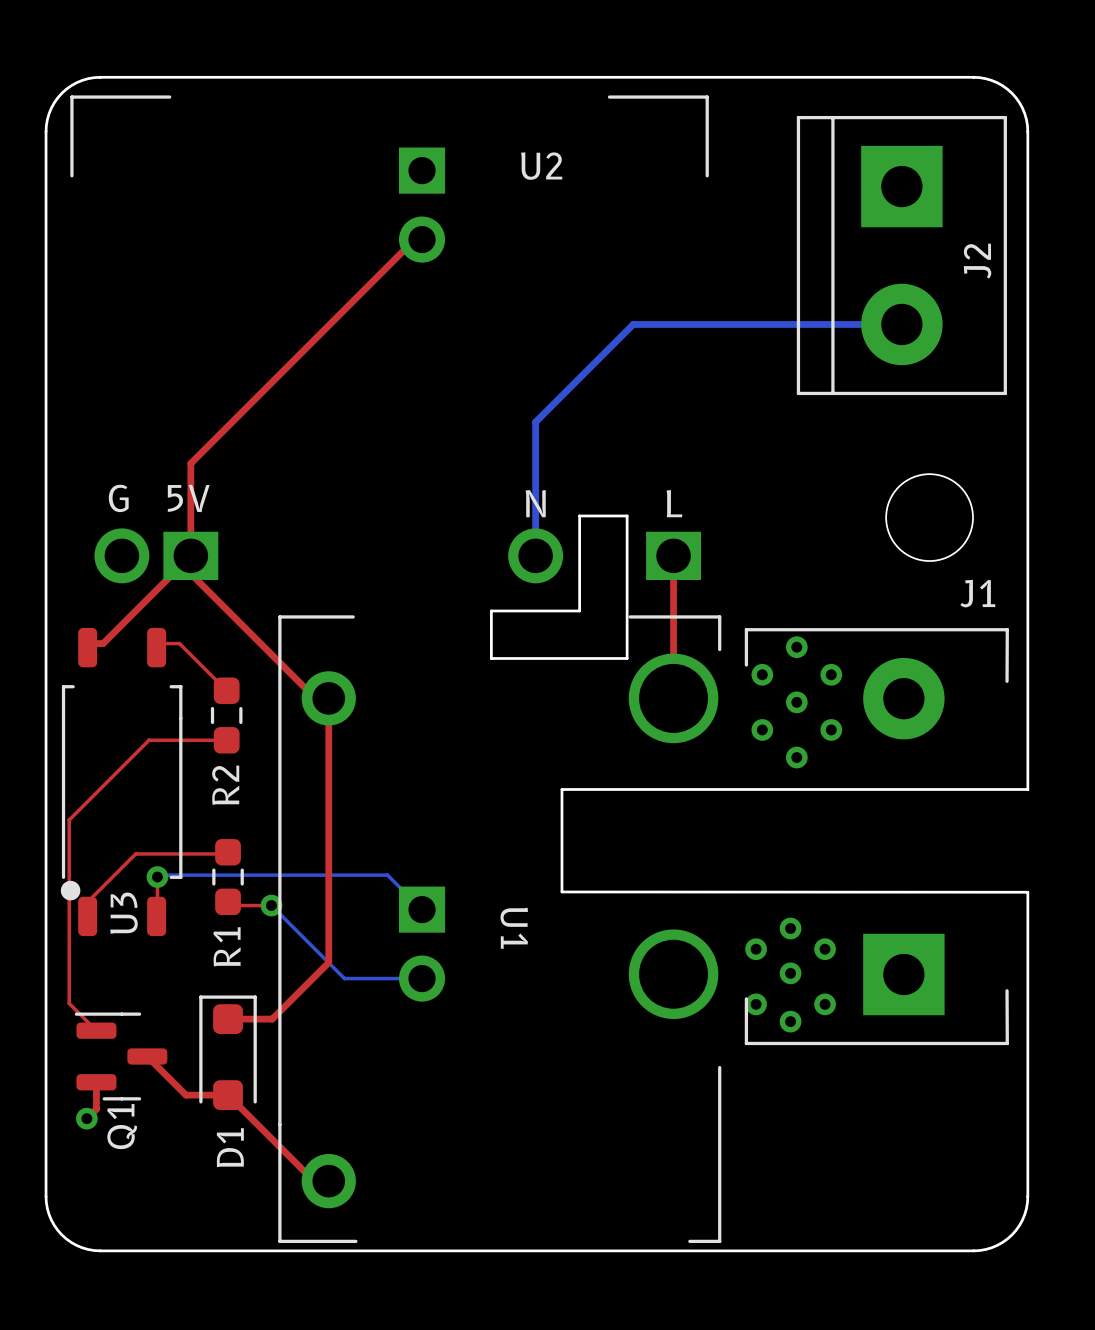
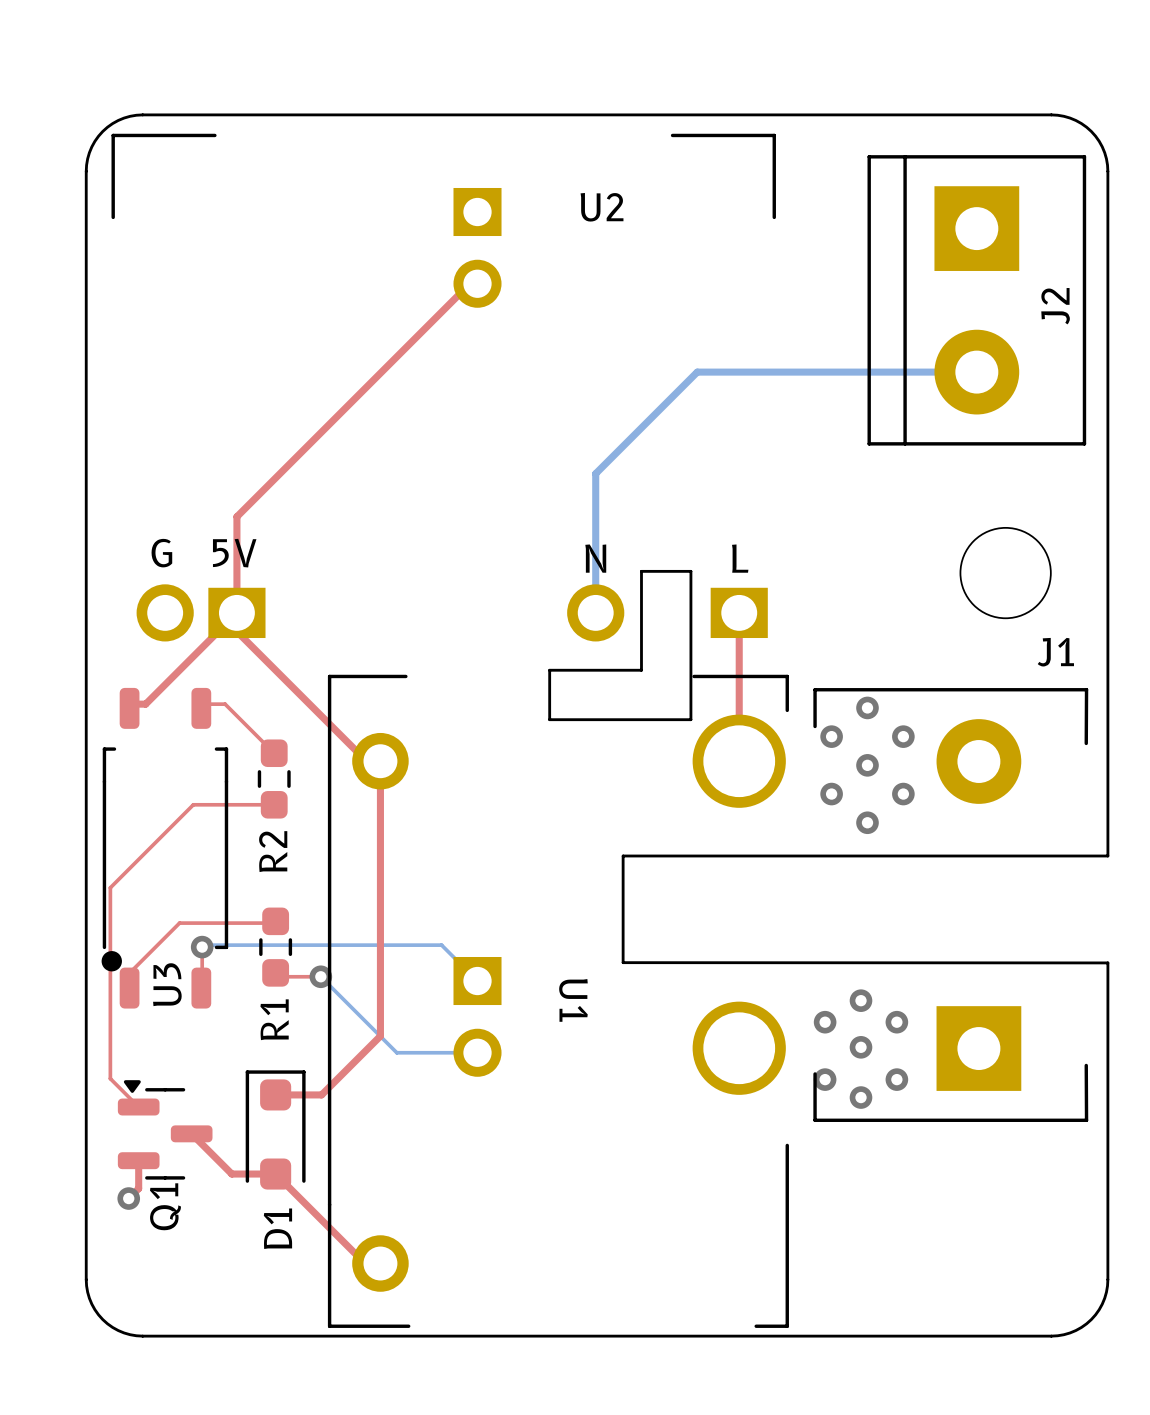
Q1 footprint: [74, 1012, 168, 1101] -> [117, 1080, 213, 1180]

